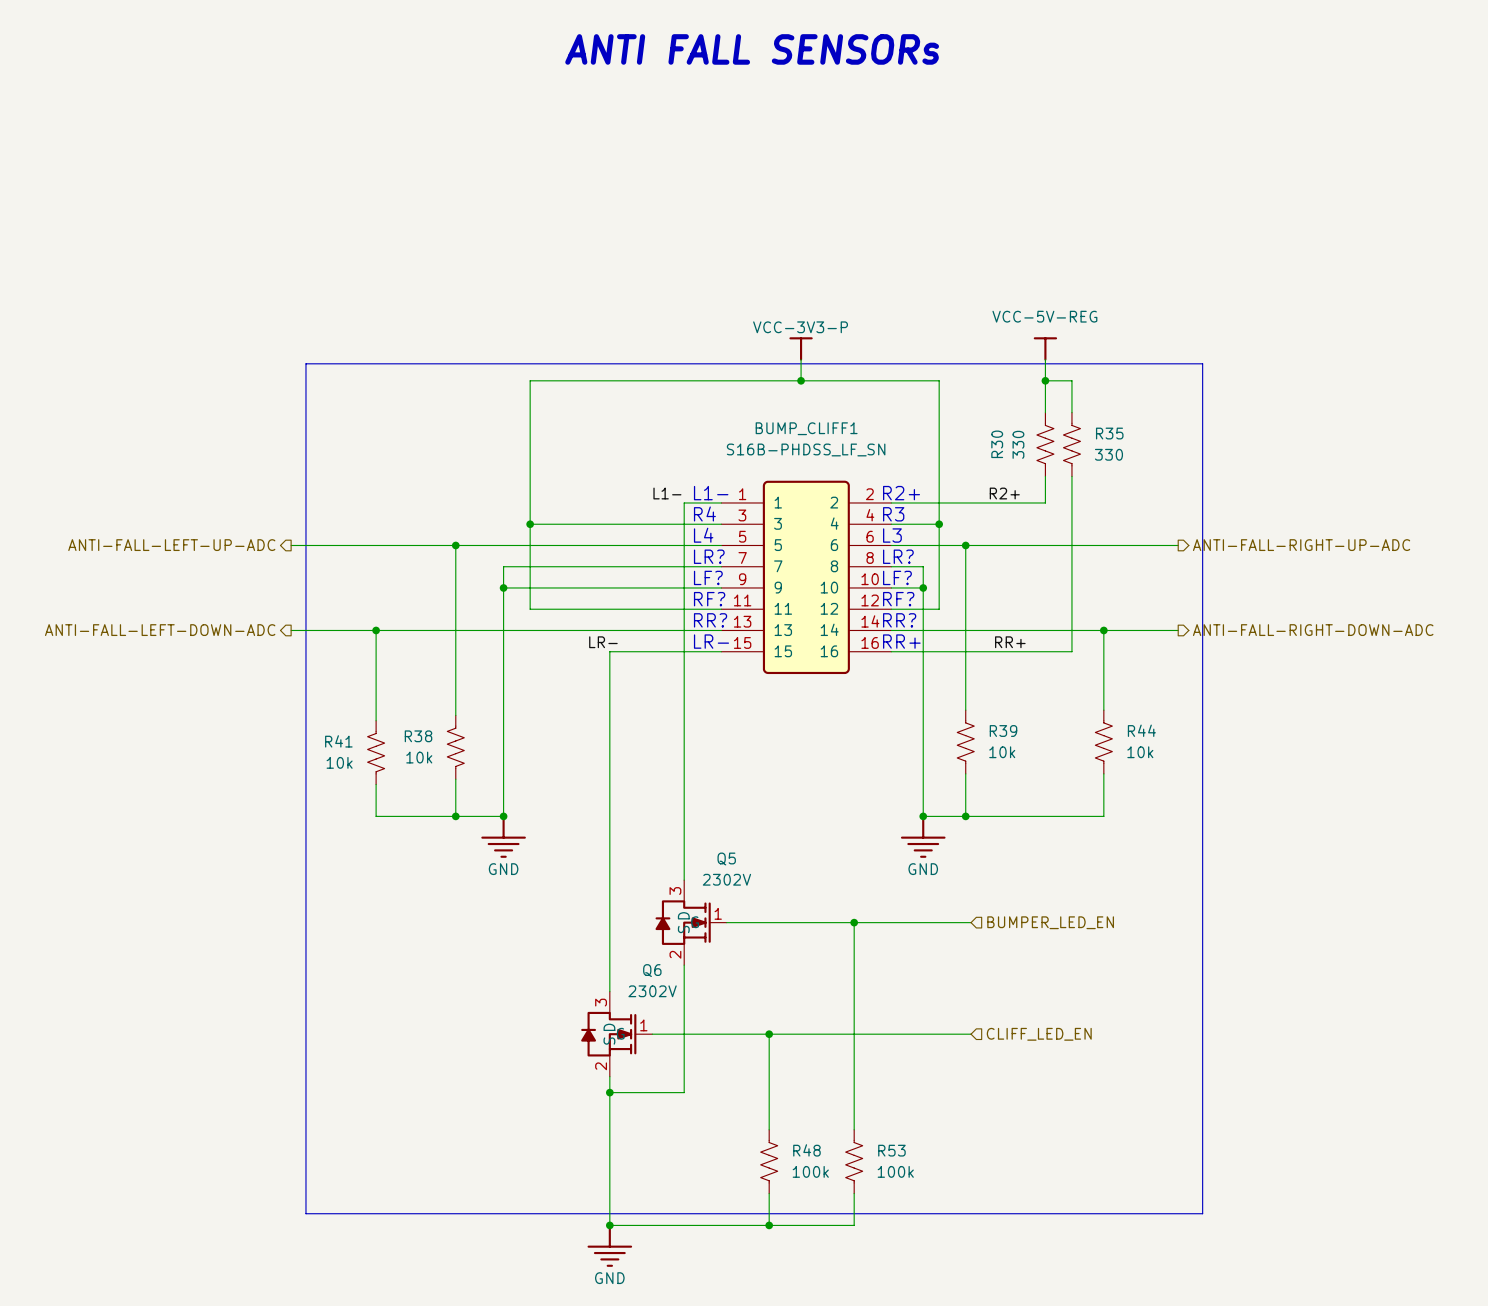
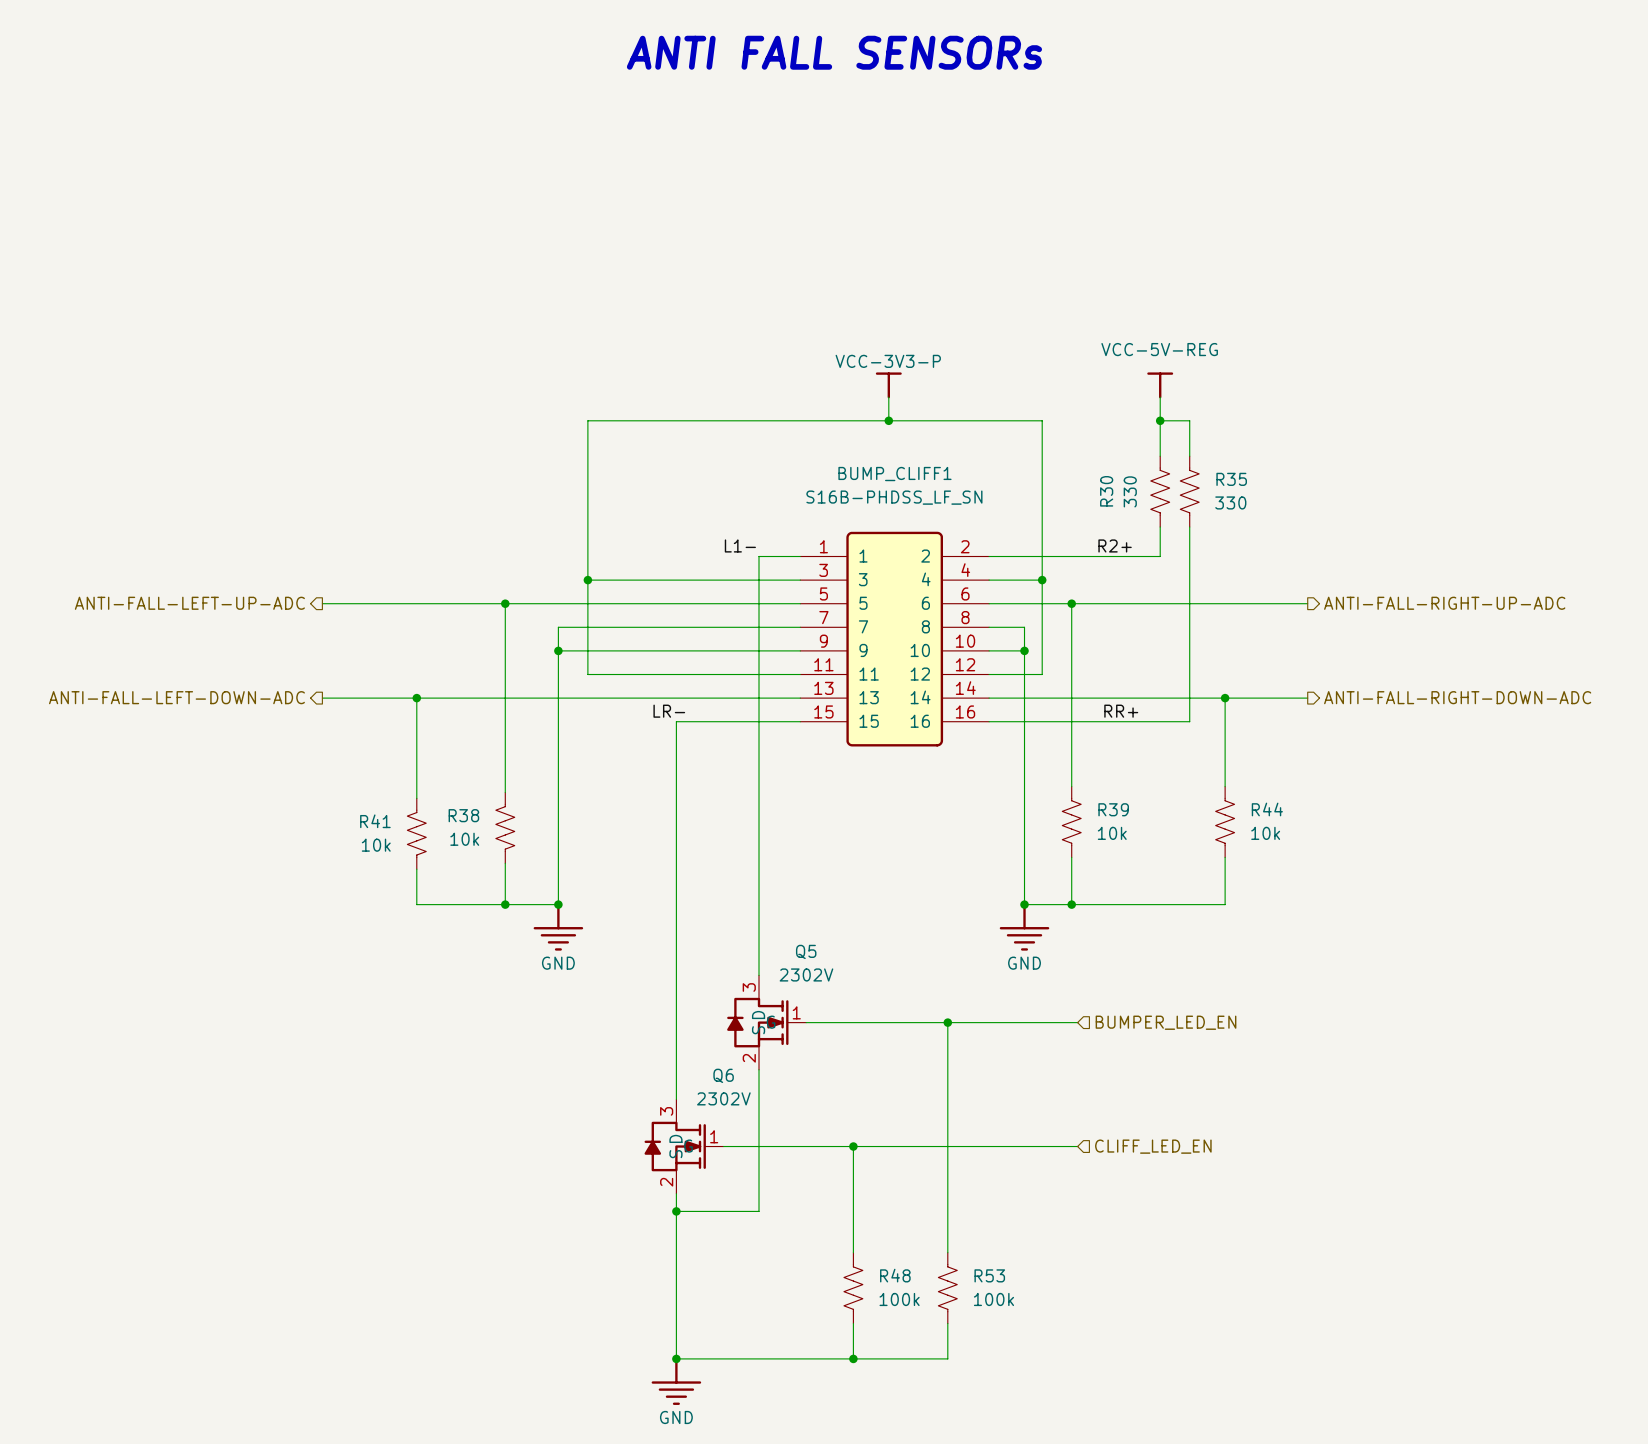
line: (305, 363) (1202, 363) (1202, 1213) (305, 1213) (305, 363) -> none
text: L1- (711, 493) -> none
text: R2+ (901, 493) -> none
text: R4 (704, 514) -> none
text: R3 (893, 514) -> none
text: L4 (703, 535) -> none
text: L3 (892, 535) -> none
text: LR? (709, 556) -> none
text: LR? (898, 556) -> none
text: LF? (708, 577) -> none
text: LF? (897, 577) -> none
text: RF? (709, 599) -> none
text: RF? (898, 599) -> none
text: RR? (710, 620) -> none
text: RR? (899, 620) -> none
text: LR- (711, 641) -> none
text: RR+ (901, 641) -> none

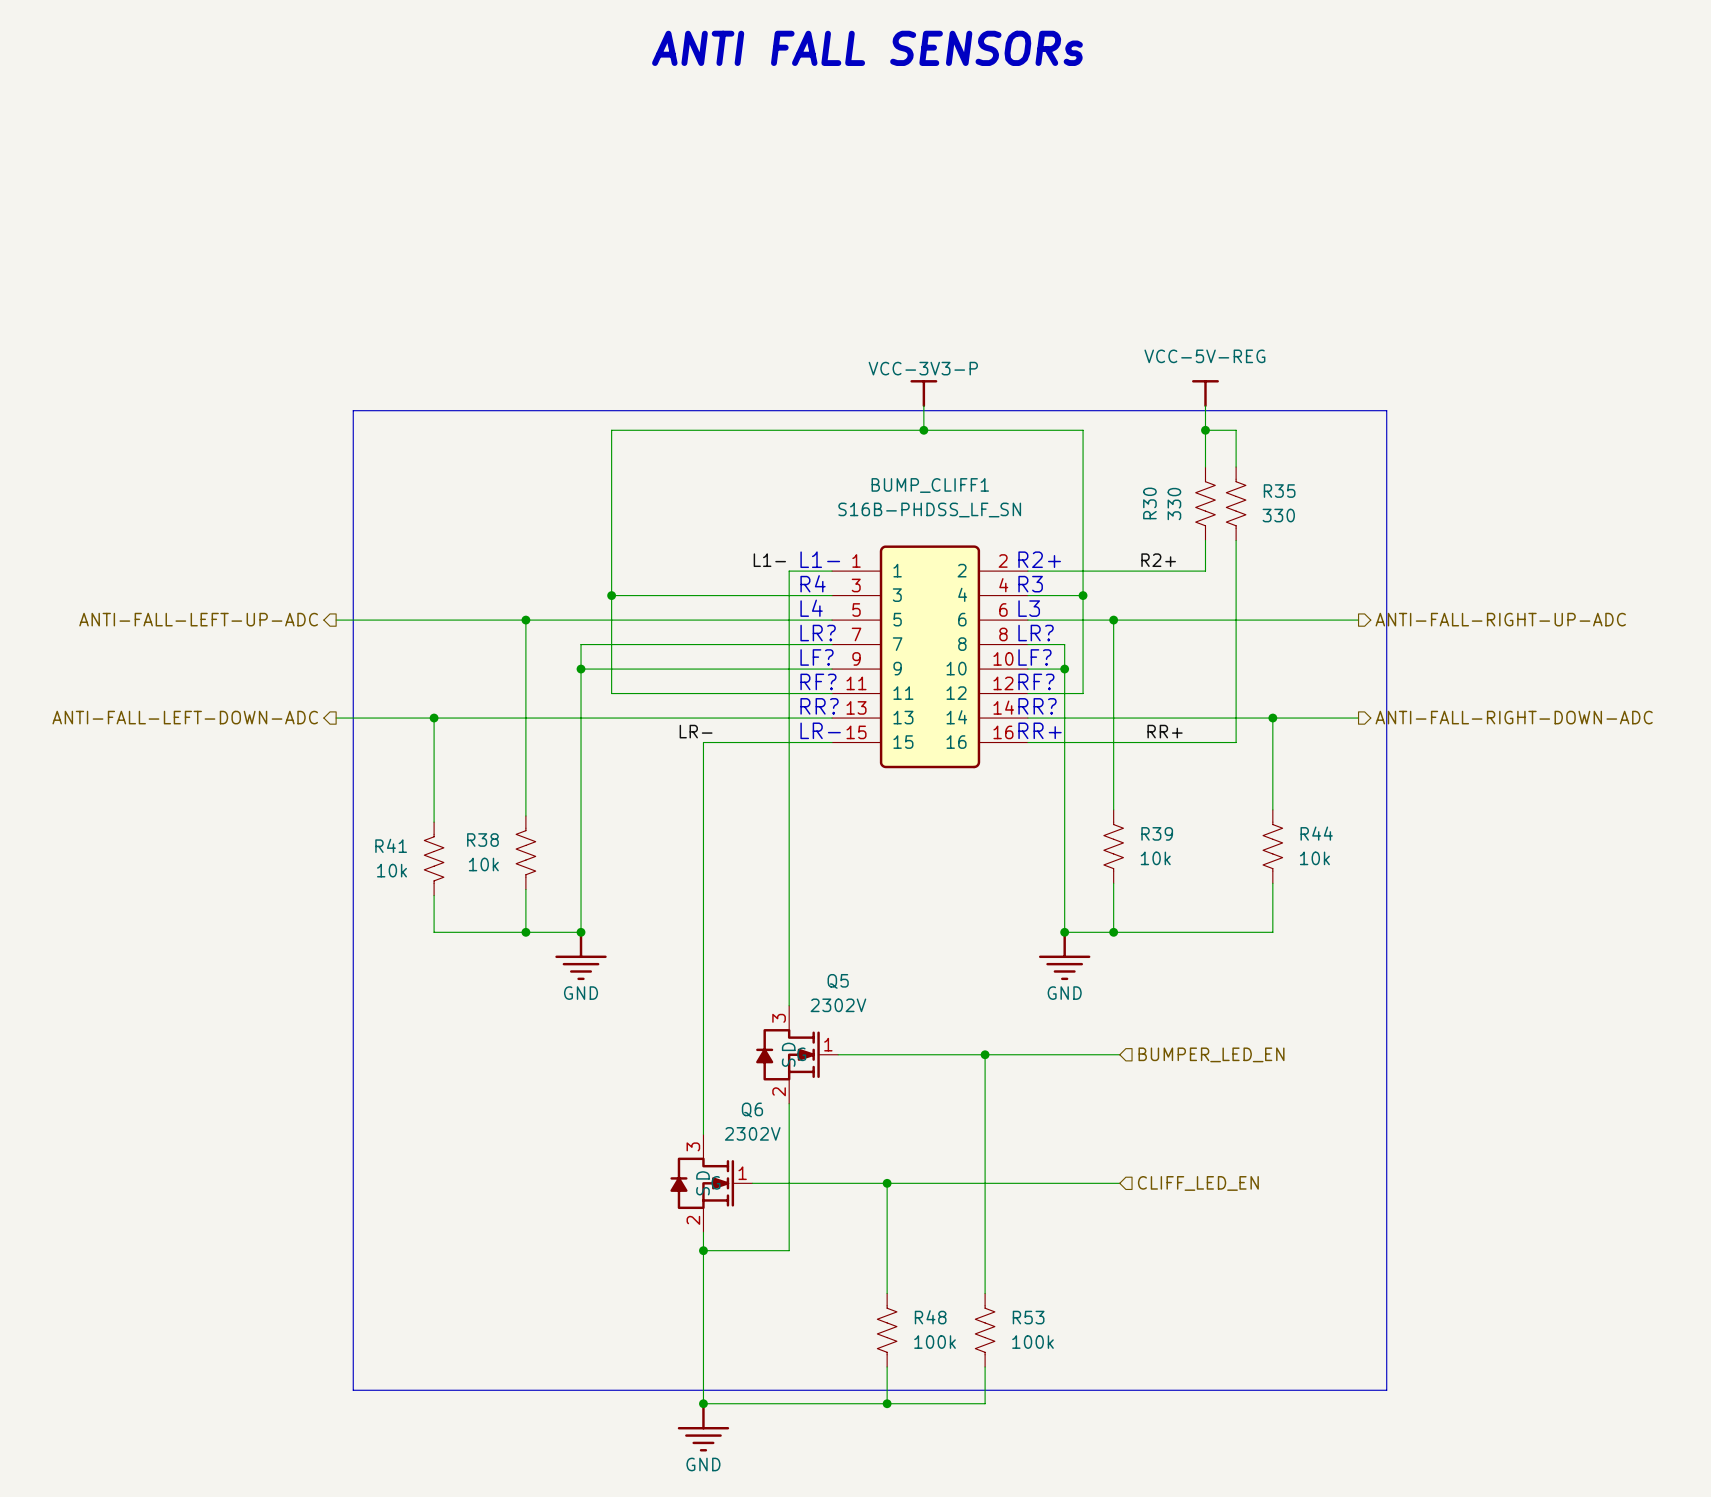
line: none -> (353, 410) (1386, 410) (1386, 1390) (353, 1390) (353, 410)
text: none -> L1- (820, 559)
text: none -> R2+ (1039, 559)
text: none -> R4 (813, 583)
text: none -> R3 (1030, 584)
text: none -> L4 (811, 608)
text: none -> L3 (1029, 608)
text: none -> LR? (818, 633)
text: none -> LR? (1036, 633)
text: none -> LF? (817, 657)
text: none -> LF? (1034, 657)
text: none -> RF? (818, 681)
text: none -> RF? (1036, 681)
text: none -> RR? (819, 706)
text: none -> RR? (1037, 706)
text: none -> LR- (820, 730)
text: none -> RR+ (1040, 730)

